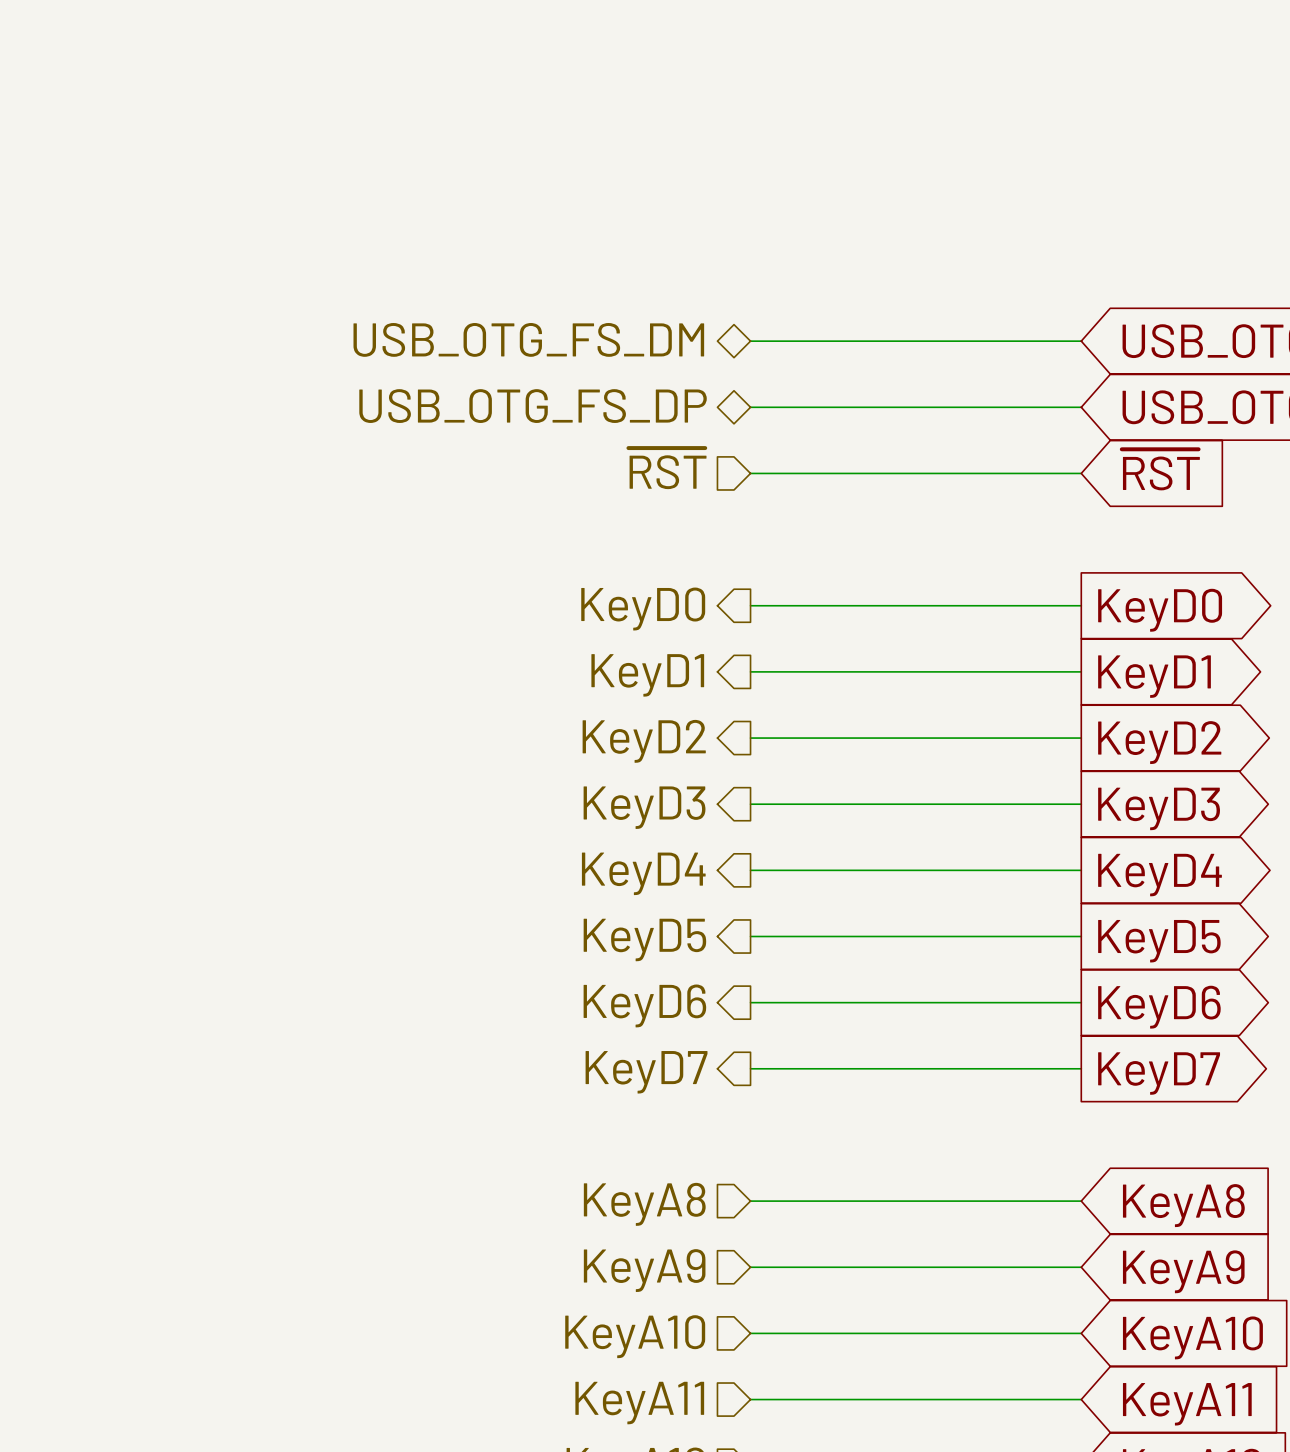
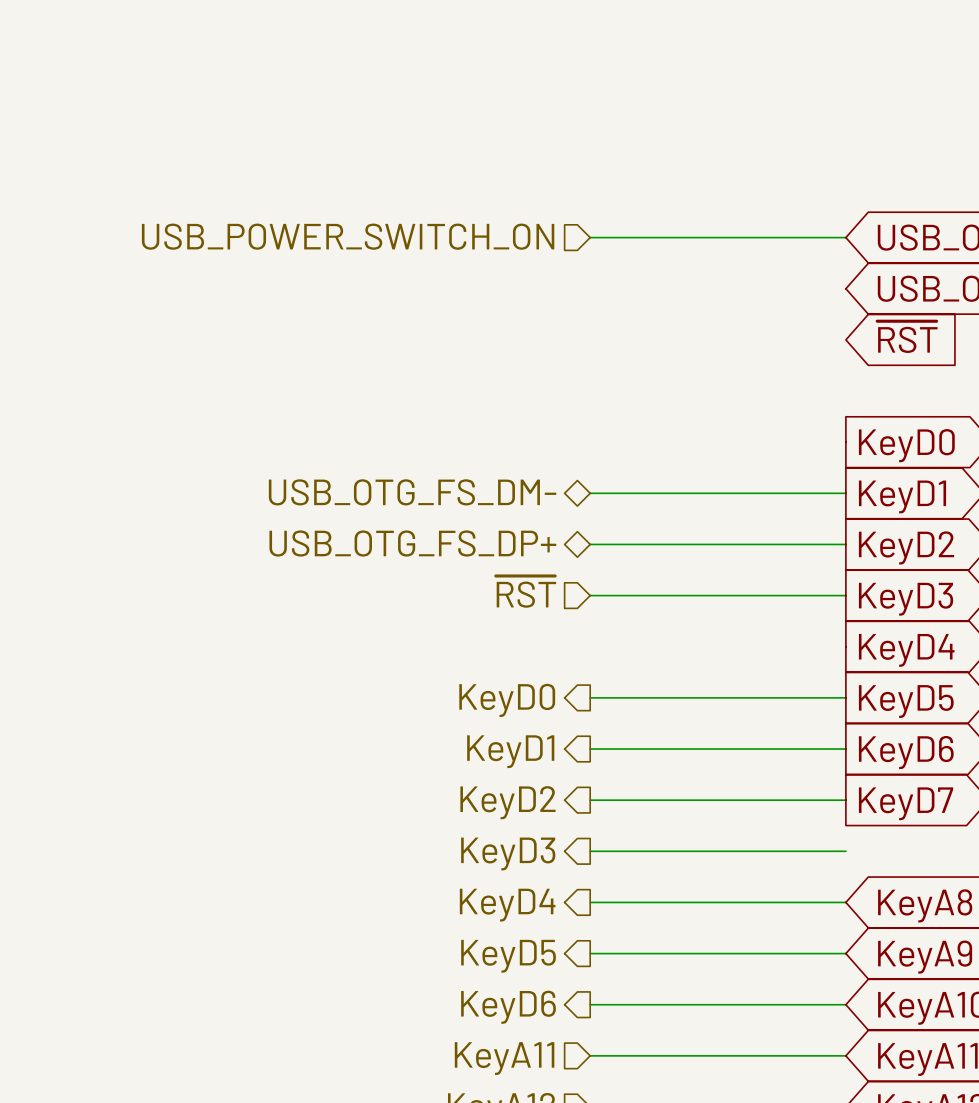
hierarchical label shape: bidirectional (528, 339) -> input (348, 236)
hierarchical label: USB_OTG_FS_DM (528, 339) -> USB_POWER_SWITCH_ON (348, 236)
hierarchical label: USB_OTG_FS_DP (533, 406) -> none
wire: (750, 407) (1081, 407) -> none
hierarchical label: ~{RST} (667, 468) -> none
wire: (750, 473) (1081, 473) -> none
wire: (750, 605) (1081, 605) -> none
hierarchical label: KeyD0 (643, 609) -> none
hierarchical label shape: output (647, 675) -> bidirectional (412, 492)
hierarchical label: KeyD1 (647, 675) -> USB_OTG_FS_DM- (412, 492)
hierarchical label shape: output (644, 741) -> bidirectional (412, 543)
hierarchical label: KeyD2 (644, 741) -> USB_OTG_FS_DP+ (412, 543)
hierarchical label shape: output (644, 807) -> input (525, 591)
hierarchical label: KeyD3 (644, 807) -> ~{RST} (525, 591)
wire: (750, 870) (1081, 870) -> (590, 851) (845, 851)
hierarchical label: KeyD4 (643, 873) -> none
hierarchical label: KeyD5 (644, 939) -> KeyD0 (507, 700)
hierarchical label: KeyD6 (644, 1005) -> KeyD1 (510, 751)
hierarchical label: KeyD7 (646, 1072) -> KeyD2 (507, 802)
hierarchical label: none -> KeyD3 (508, 854)
hierarchical label shape: input (644, 1204) -> output (507, 905)
hierarchical label: KeyA8 (644, 1204) -> KeyD4 (507, 905)
hierarchical label shape: input (644, 1270) -> output (508, 956)
hierarchical label: KeyA9 (644, 1270) -> KeyD5 (508, 956)
hierarchical label shape: input (635, 1336) -> output (508, 1007)
hierarchical label: KeyA10 (635, 1336) -> KeyD6 (508, 1007)

